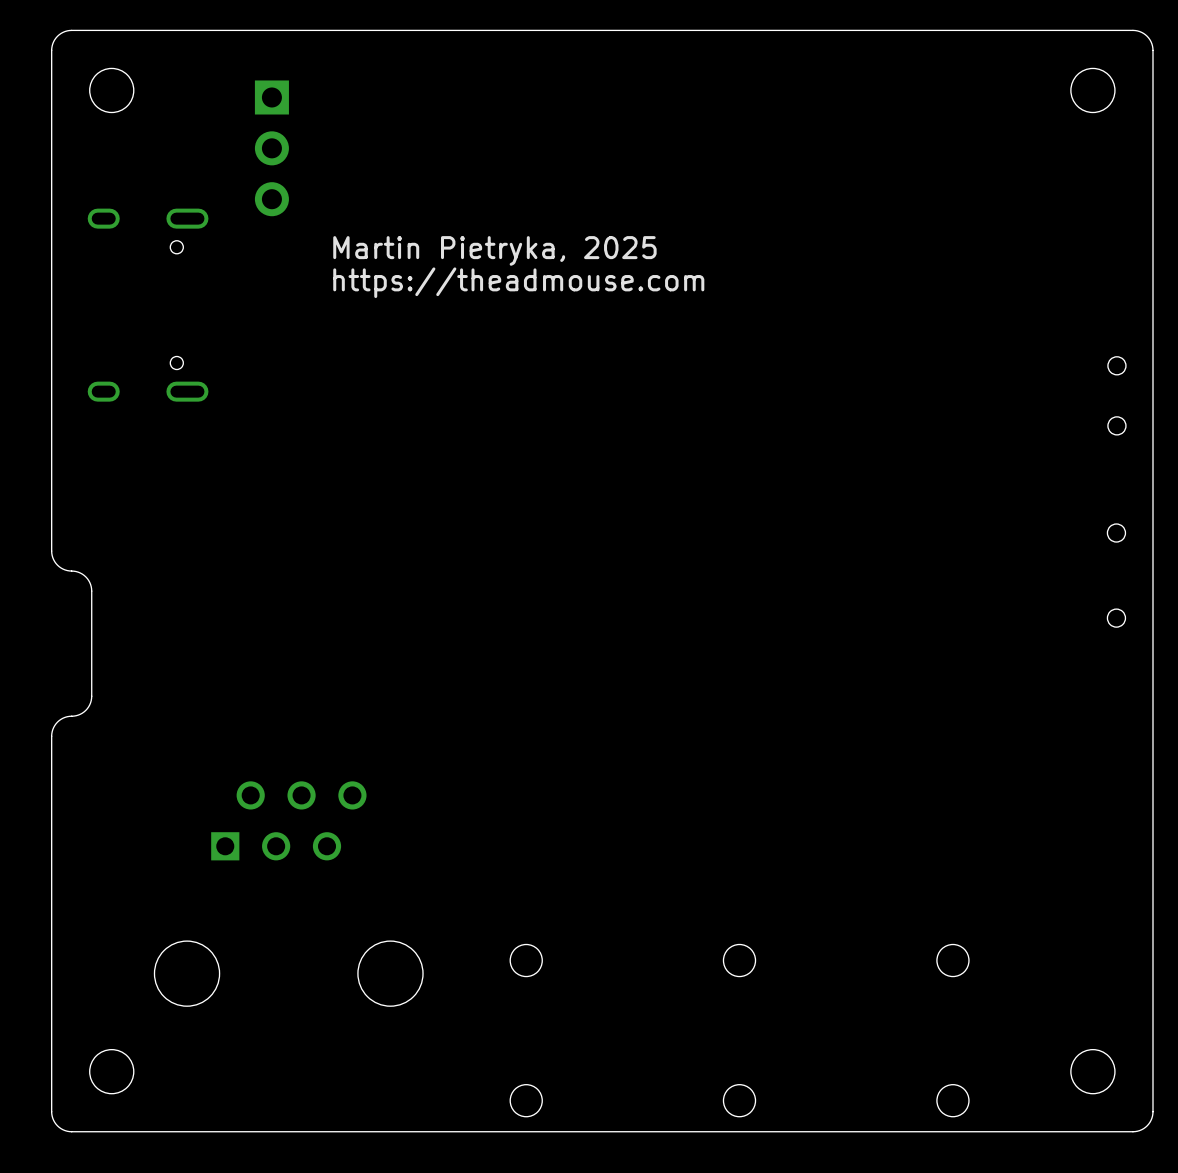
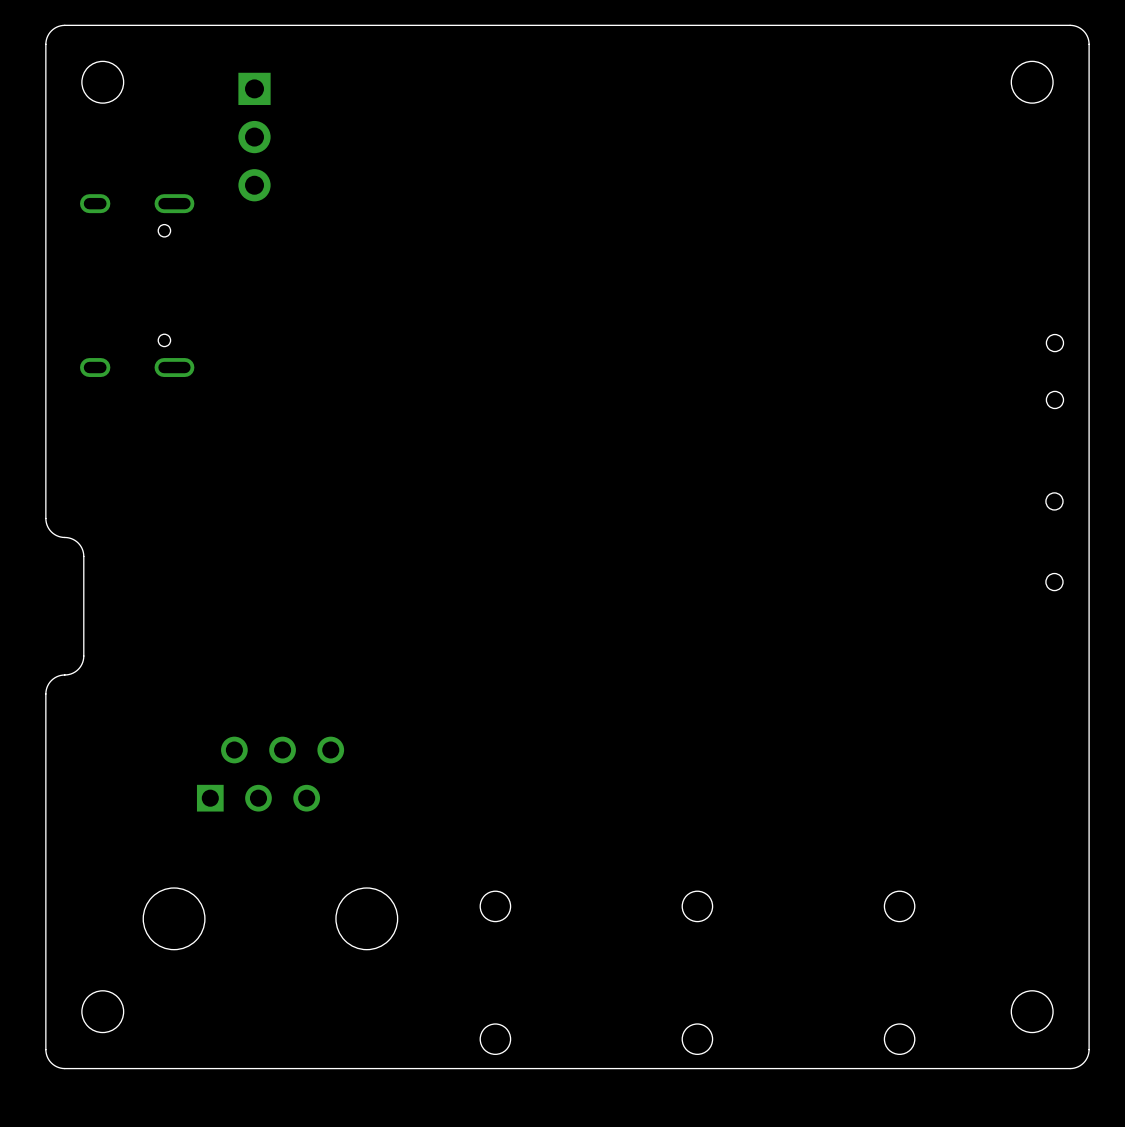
text: Martin Pietryka, 2025 (494, 250) -> none
text: https://theadmouse.com (518, 282) -> none

